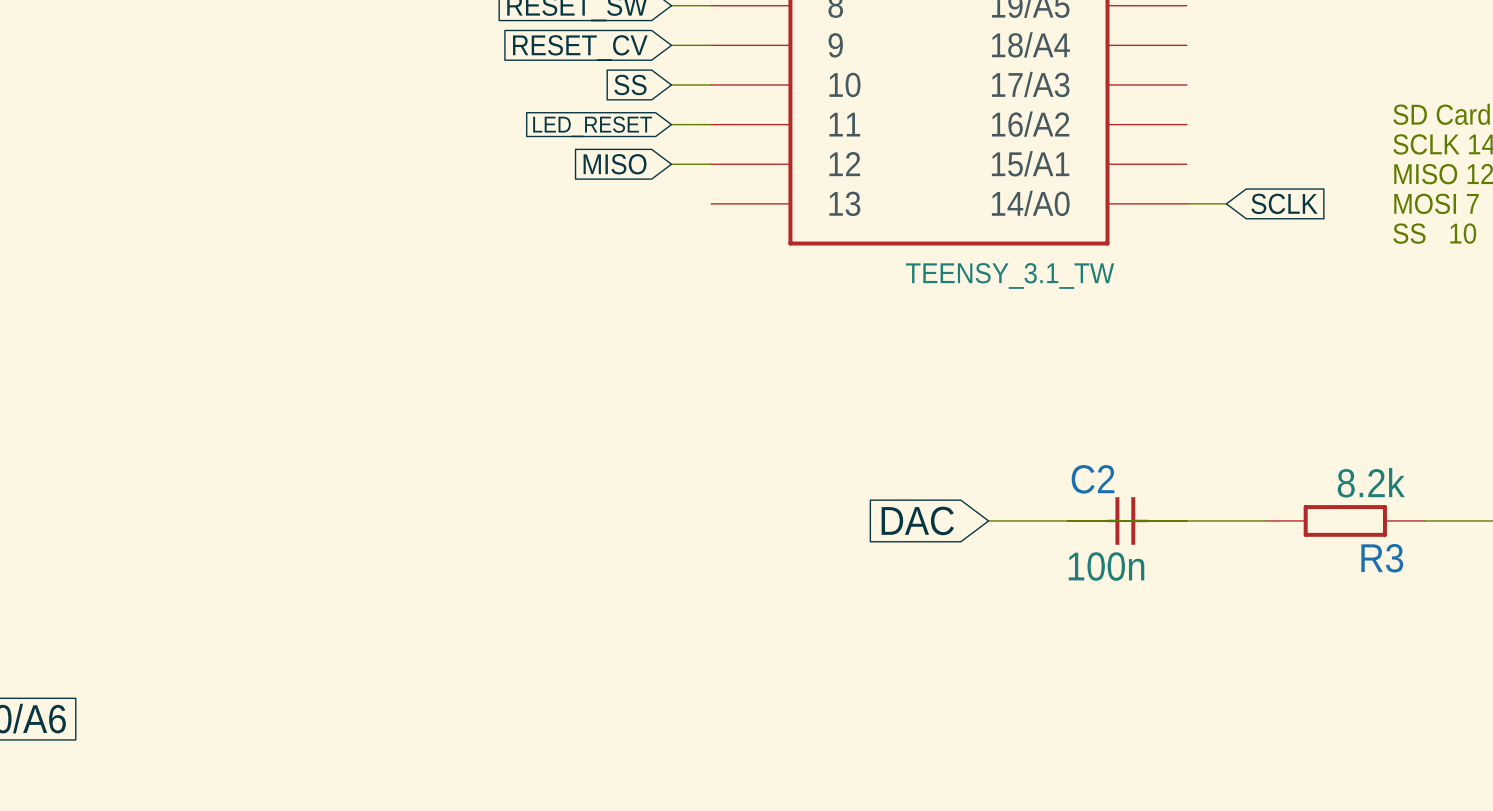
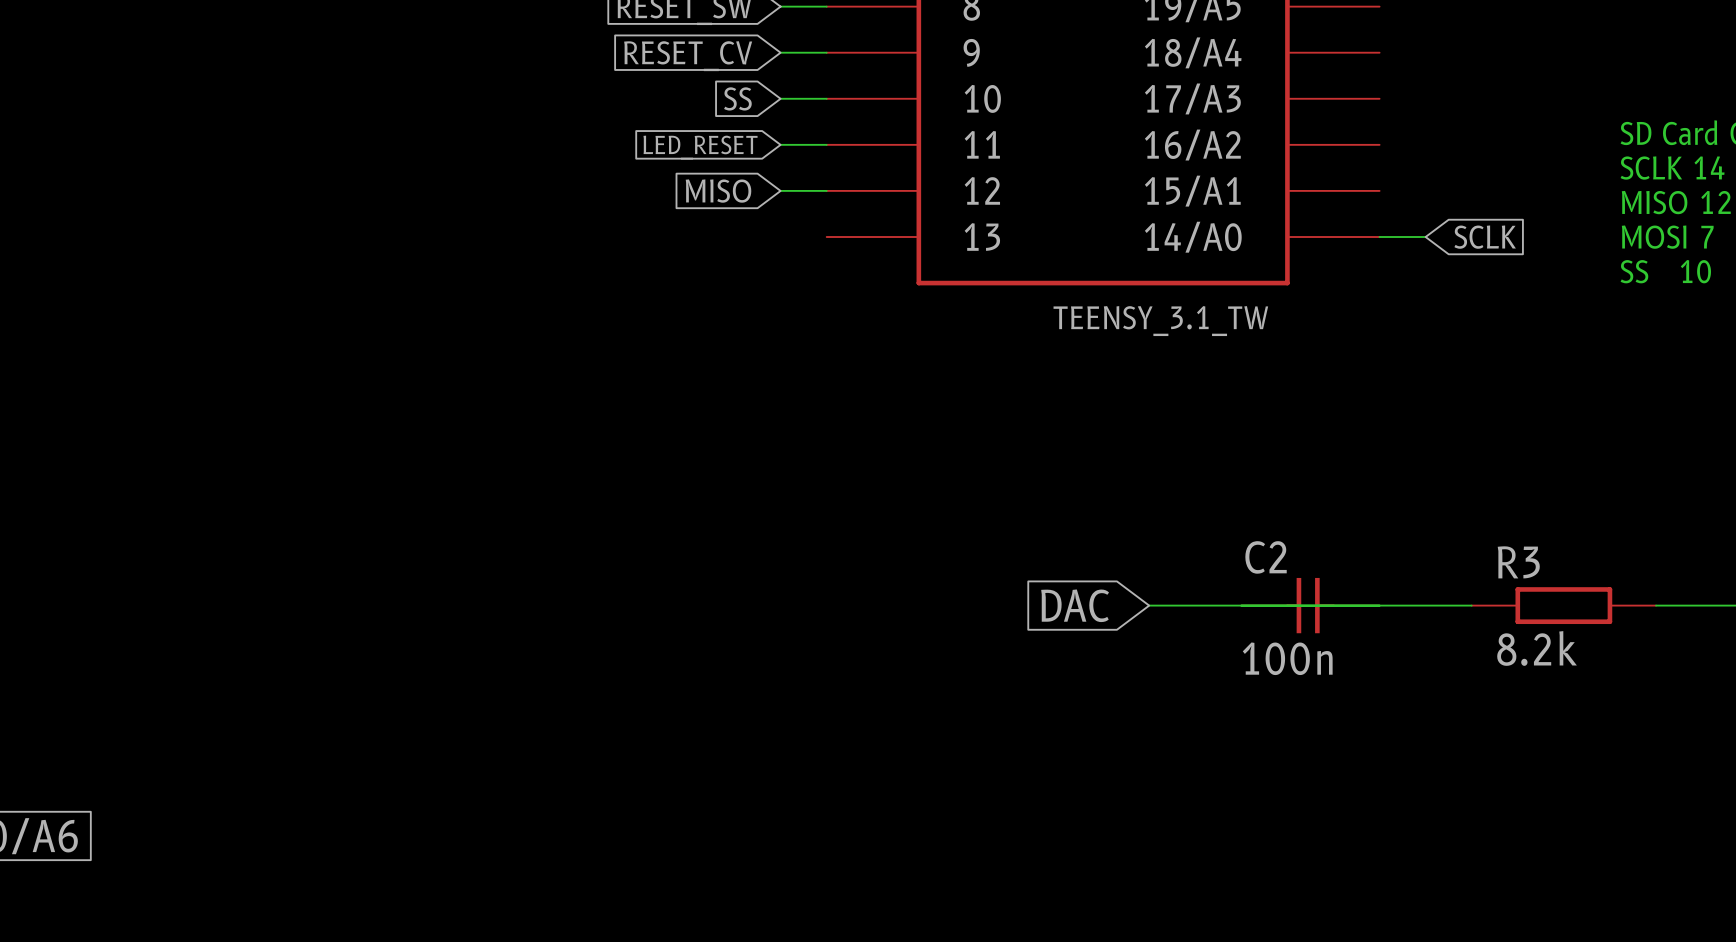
R3 value position: 8.2k (1371, 482) -> 8.2k (1537, 648)
R3 name position: R3 (1382, 558) -> R3 (1518, 562)

